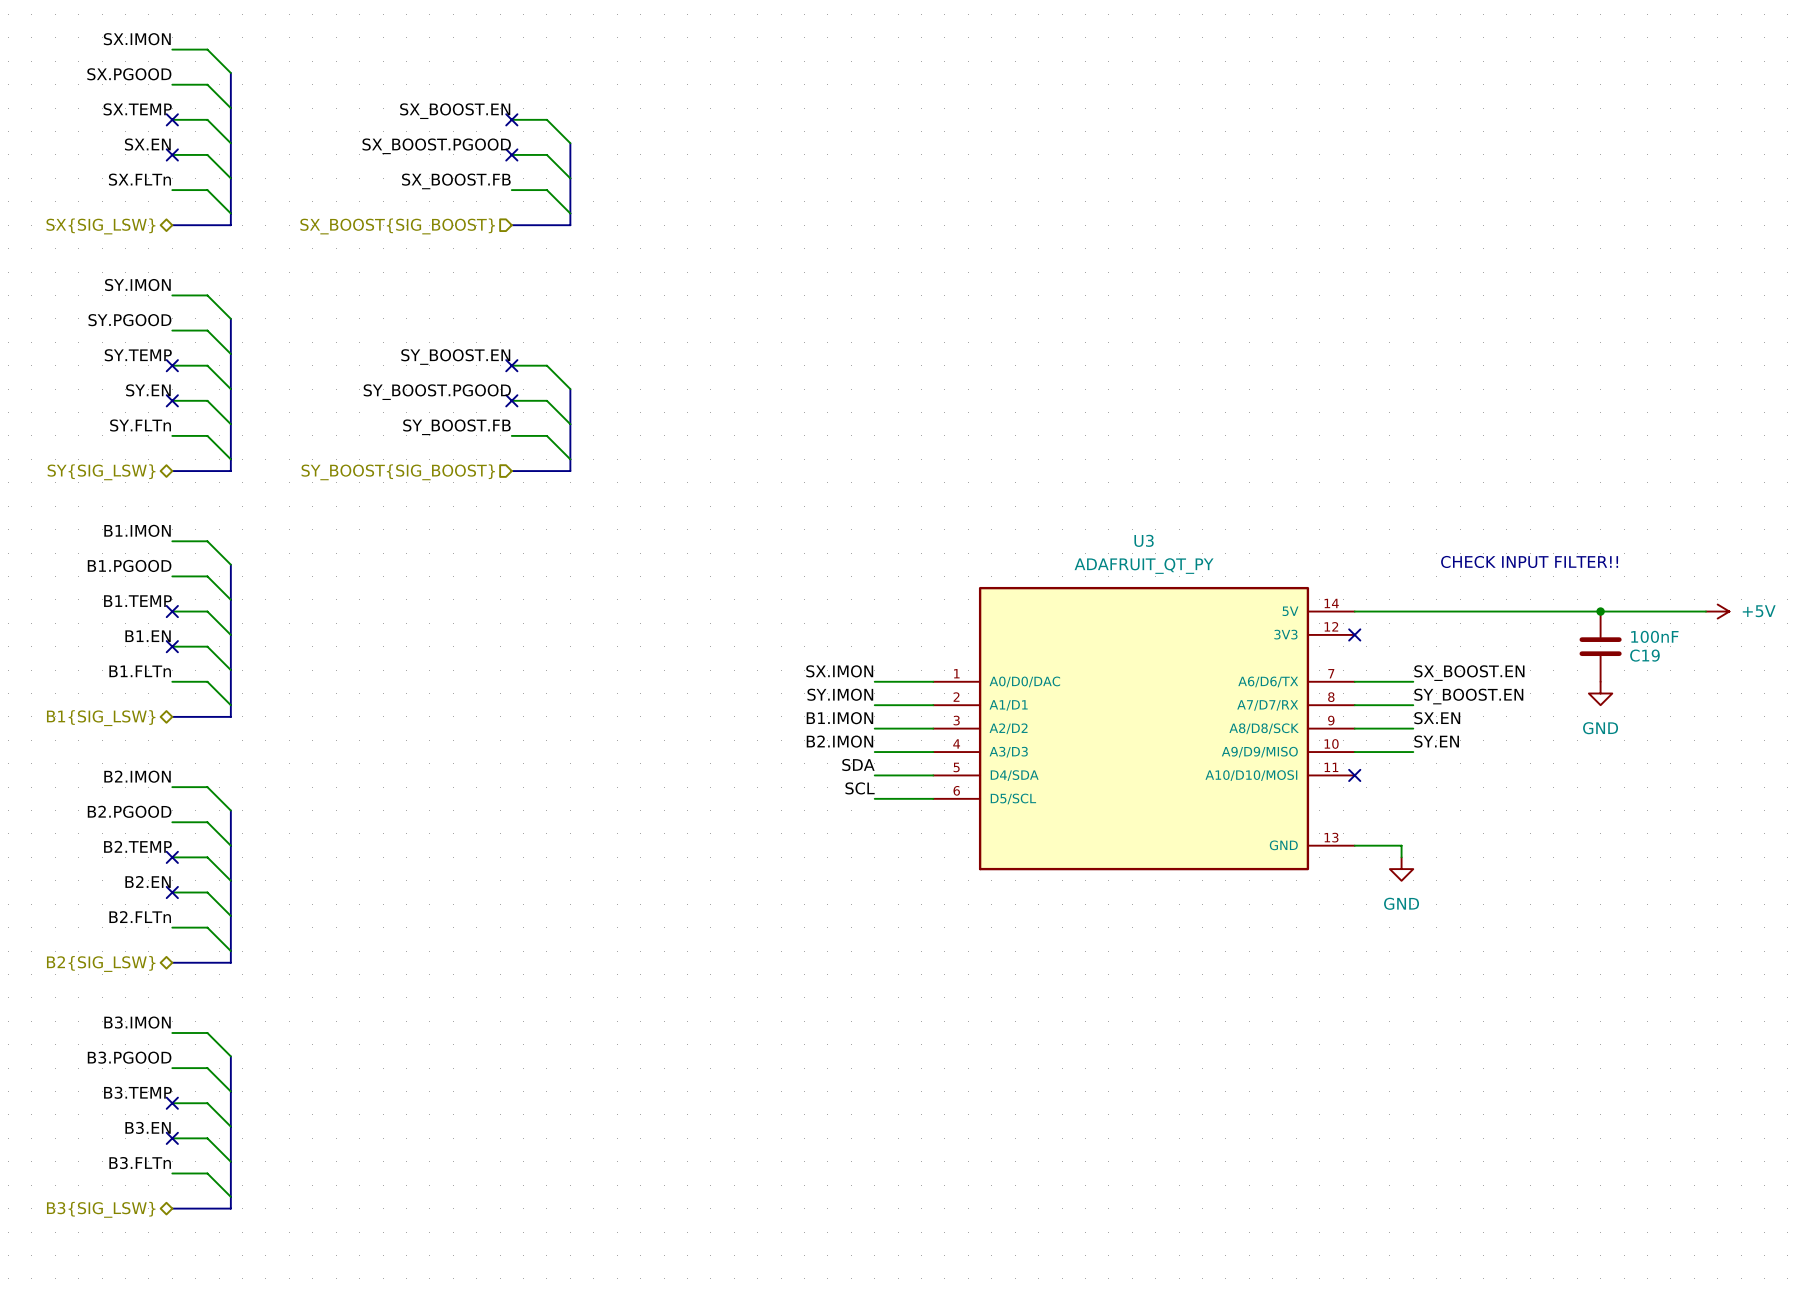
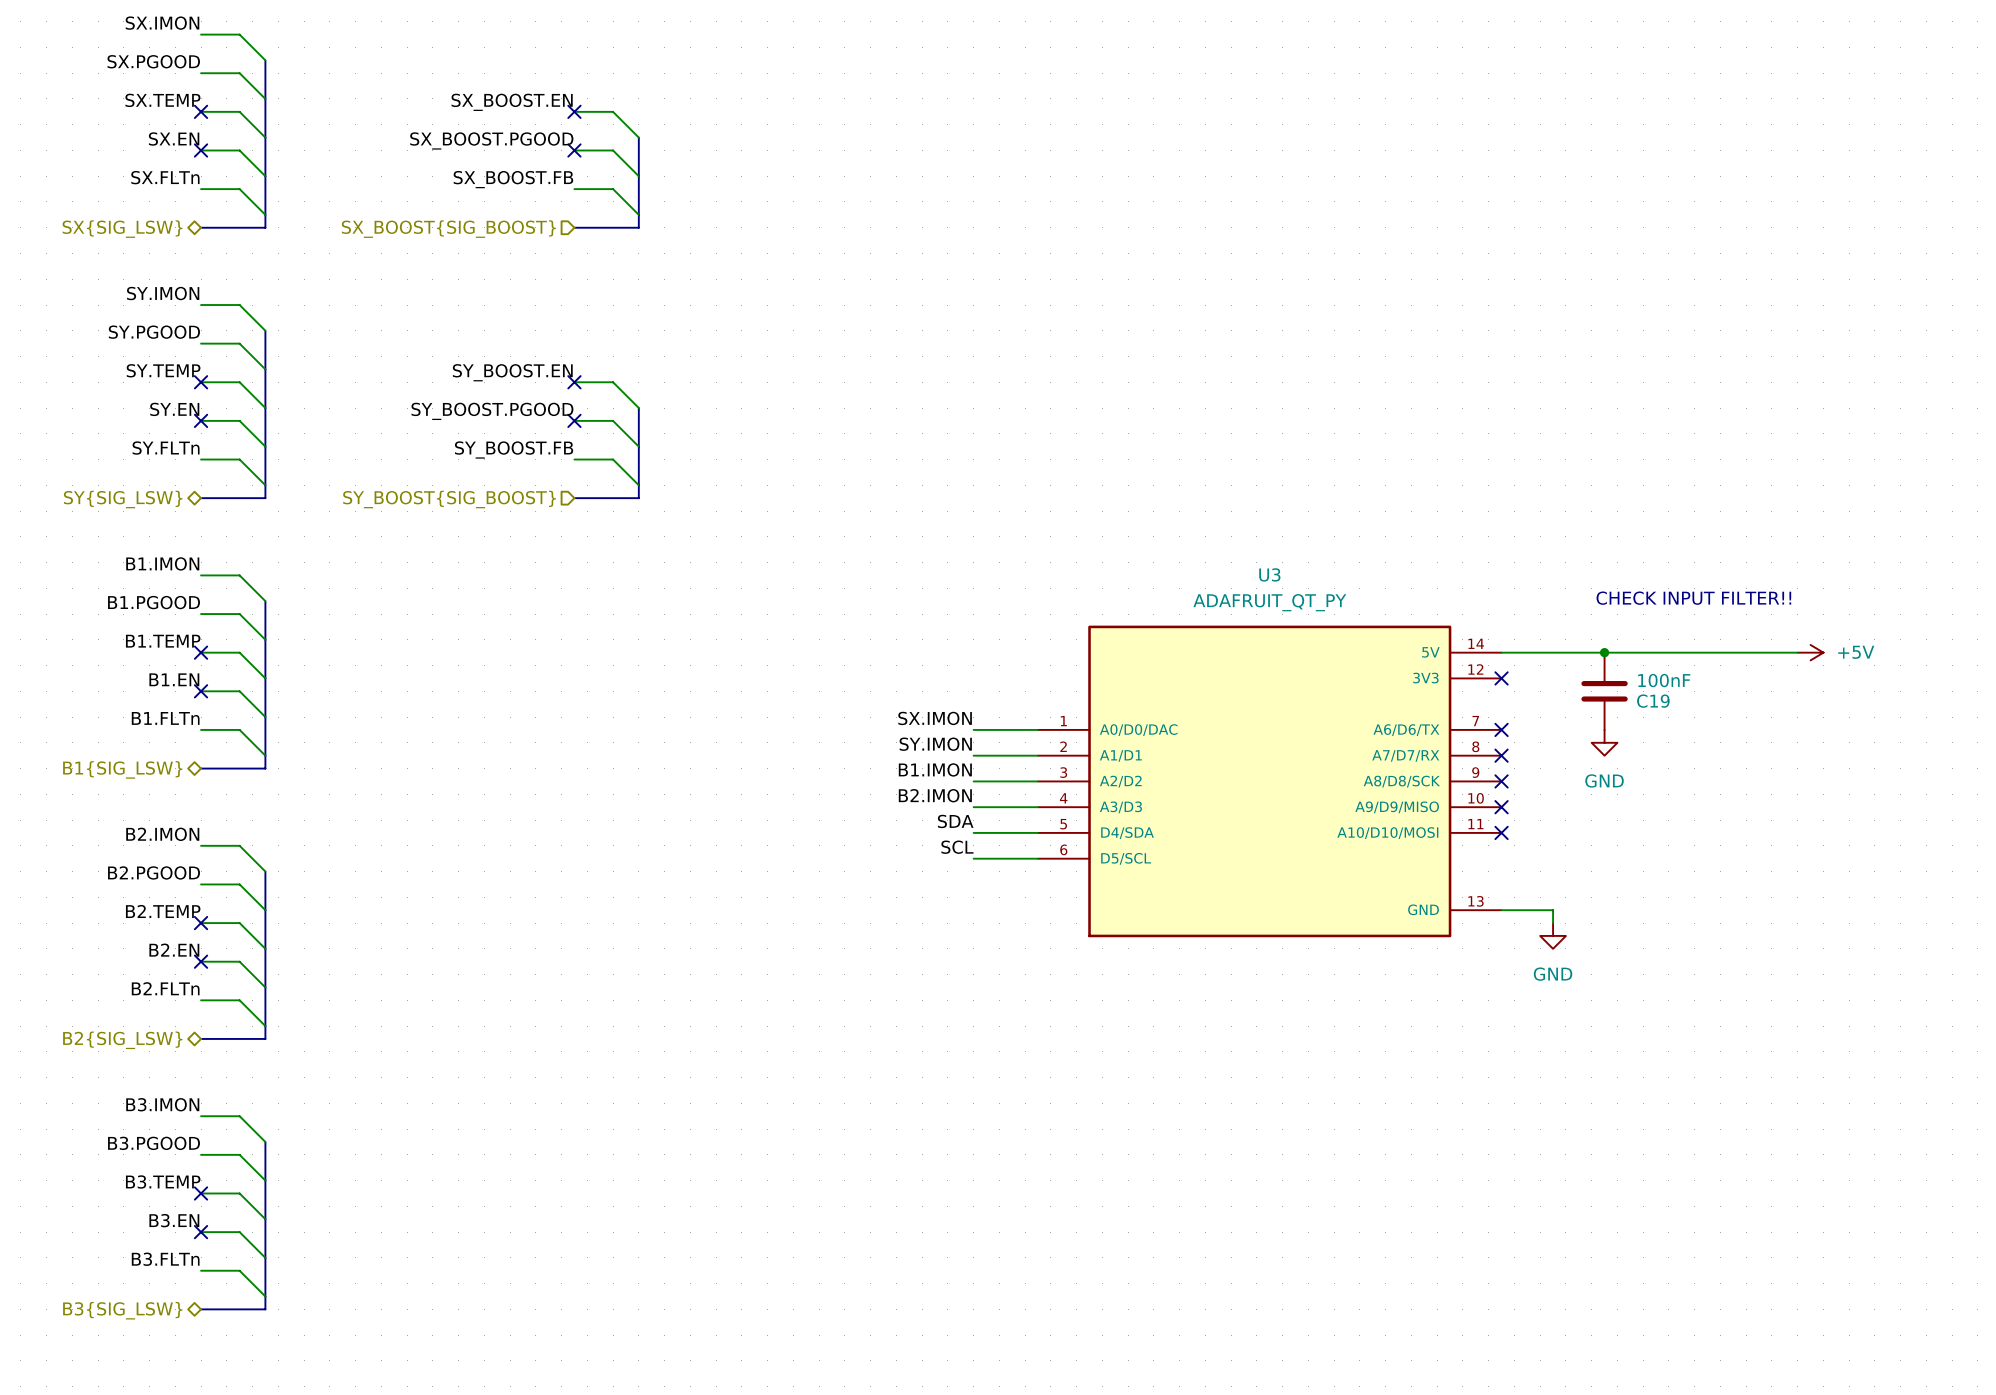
junction: none -> (1604, 652)
junction: (1600, 611) -> none
wire: (1624, 611) (1705, 611) -> none
power symbol position: +5V (1717, 611) -> +5V (1810, 652)
C19 position: (1600, 646) -> (1604, 691)
label: SX_BOOST.EN (1469, 673) -> none
wire: (1354, 681) (1413, 681) -> none
no-connect mark: none -> (1501, 729)
power symbol position: GND (1600, 693) -> GND (1604, 742)
label: SY_BOOST.EN (1468, 696) -> none
wire: (1354, 705) (1413, 705) -> none
no-connect mark: none -> (1501, 755)
label: SX.EN (1437, 718) -> none
wire: (1354, 728) (1413, 728) -> none
no-connect mark: none -> (1501, 781)
label: SY.EN (1436, 741) -> none
wire: (1354, 752) (1413, 752) -> none
no-connect mark: none -> (1501, 807)

